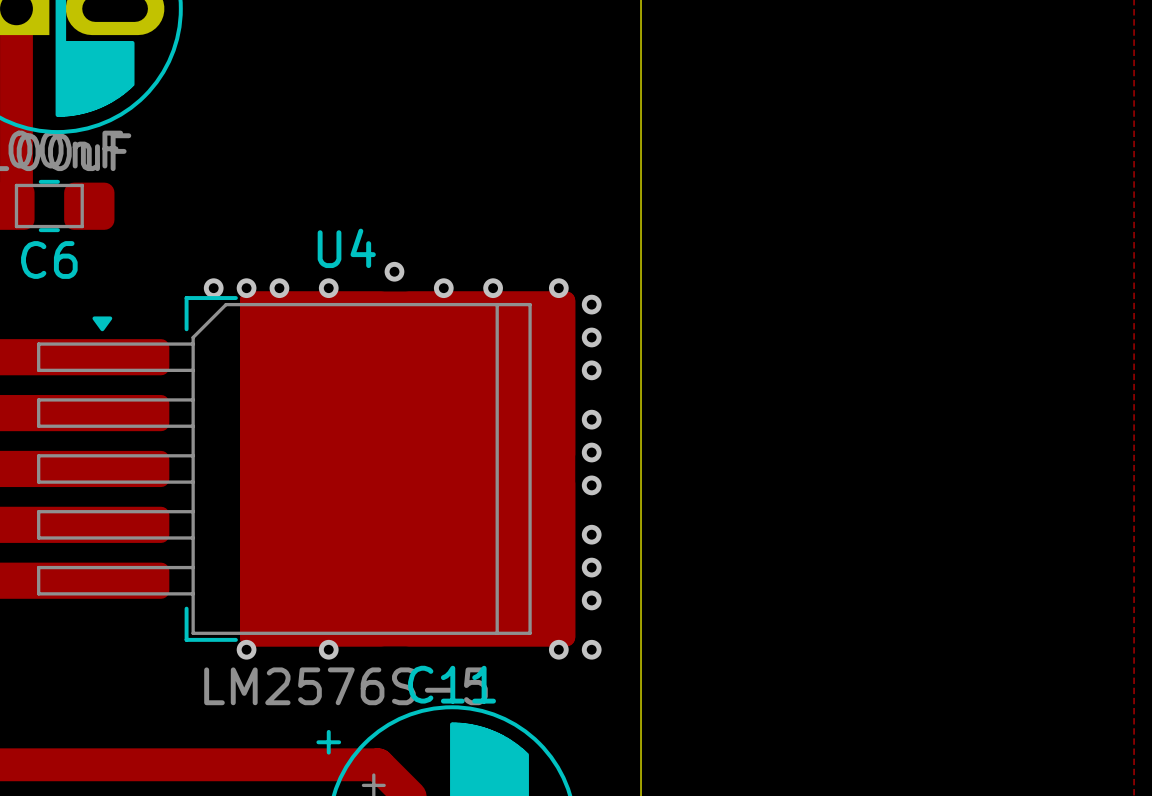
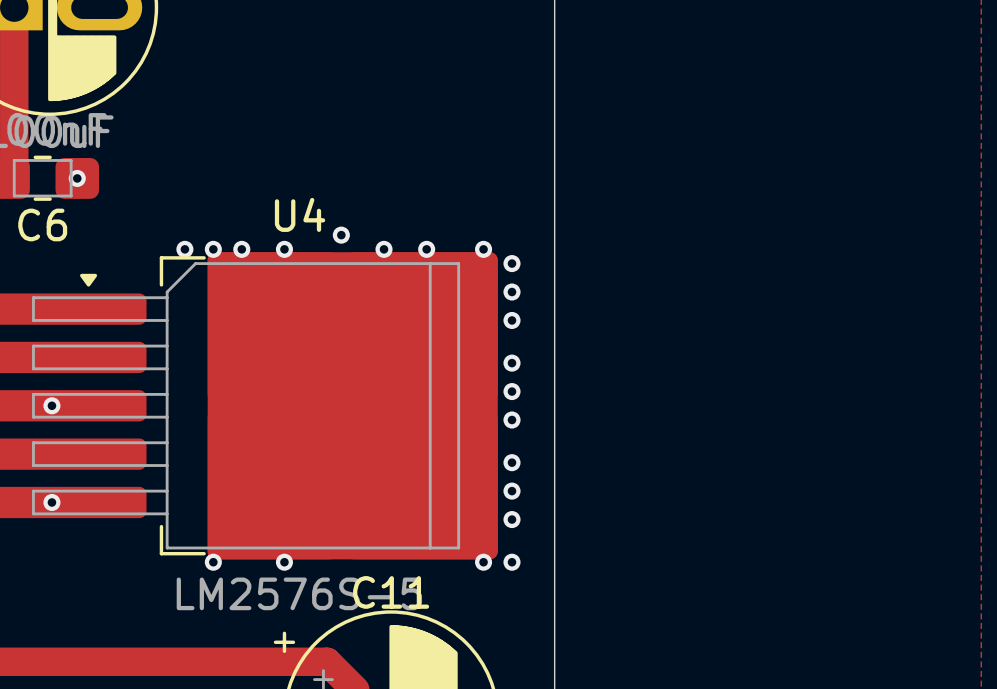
via: none -> (77, 178)
via: none -> (51, 405)
via: none -> (51, 502)

